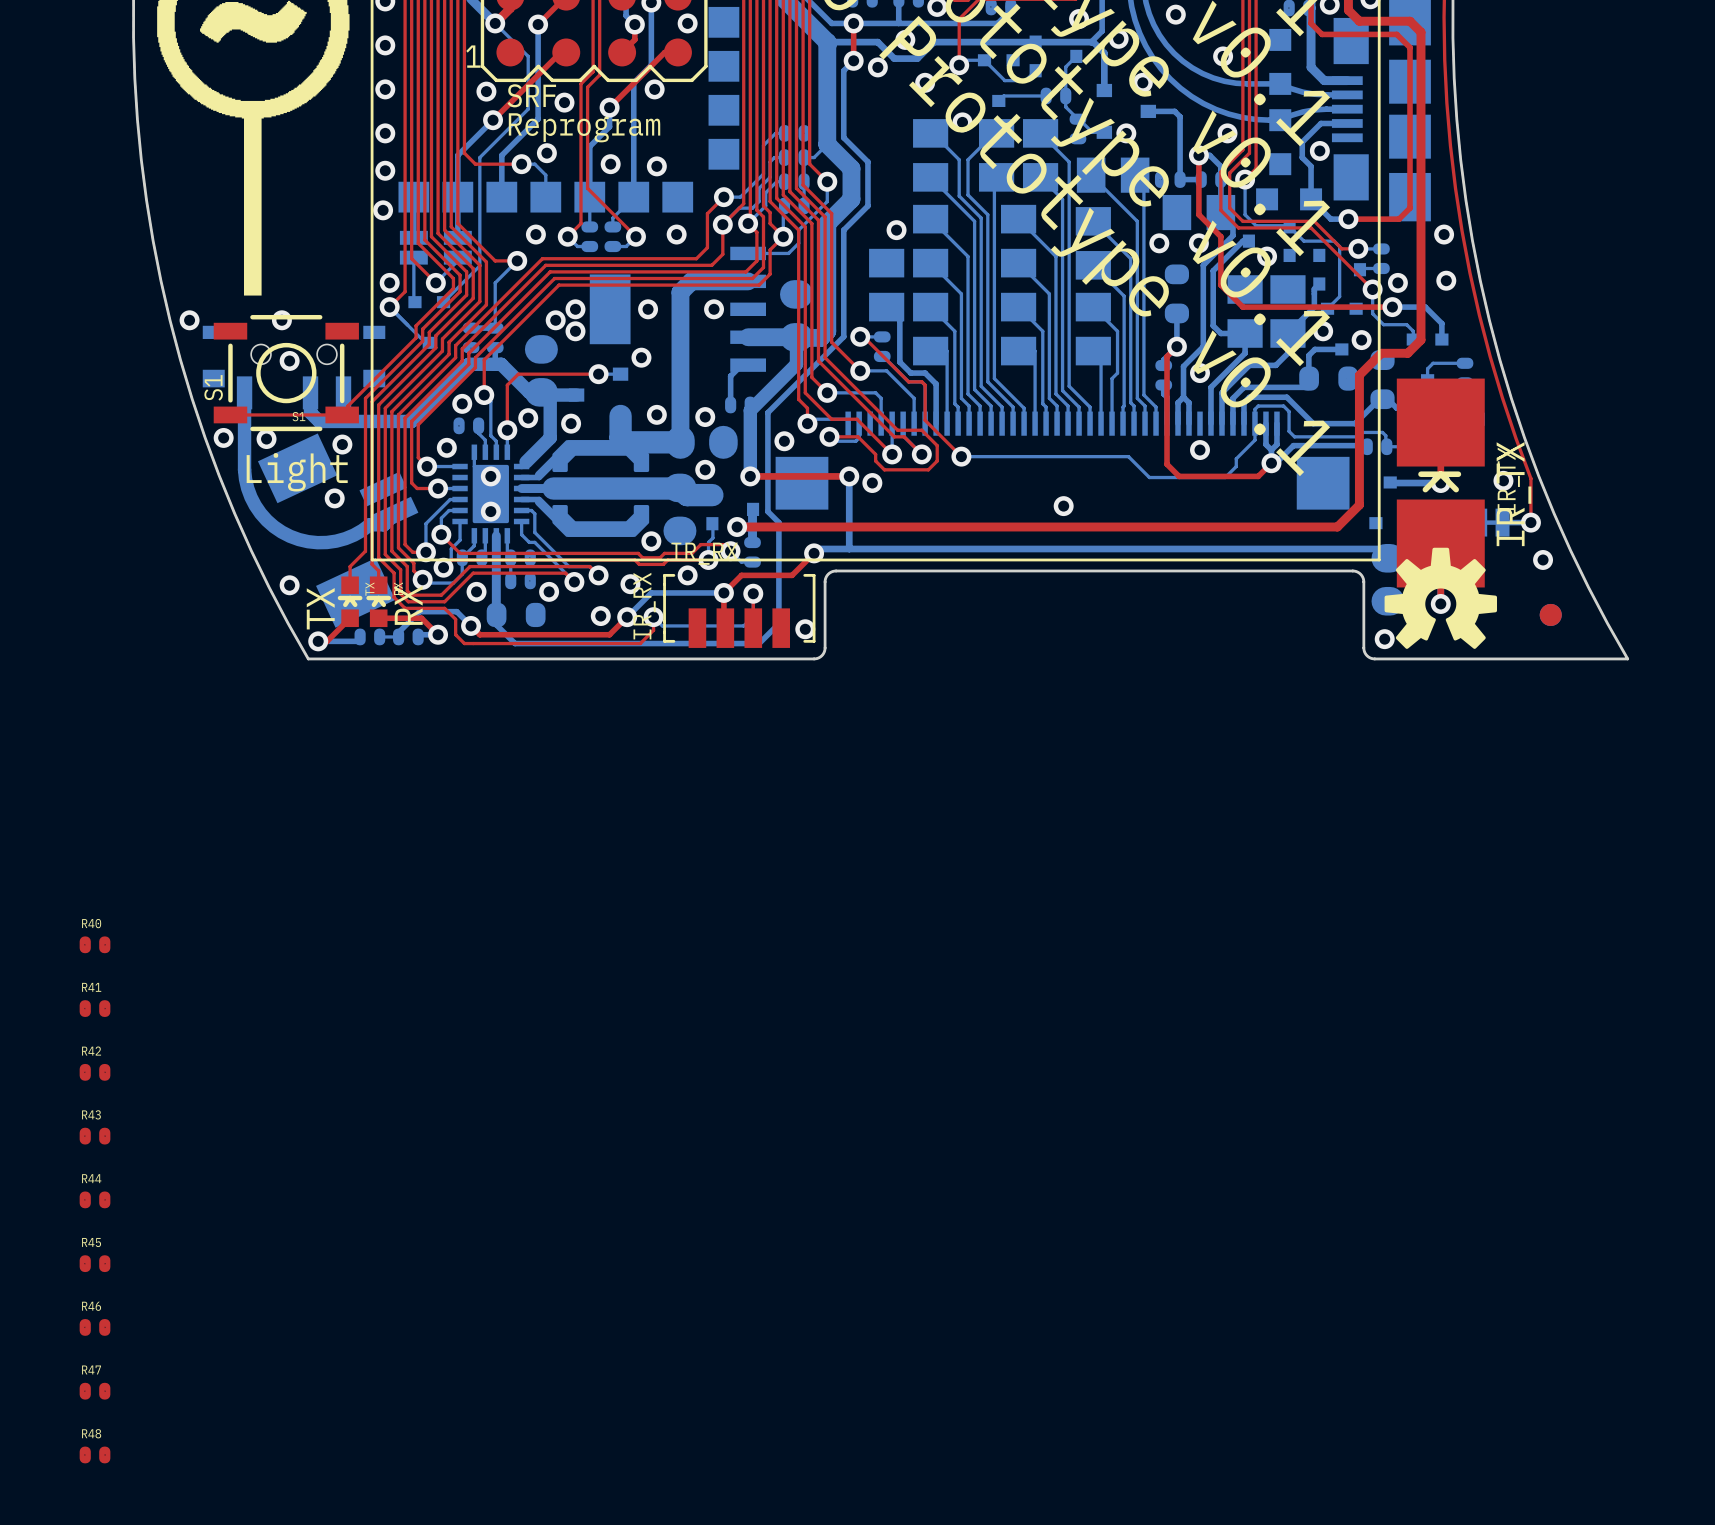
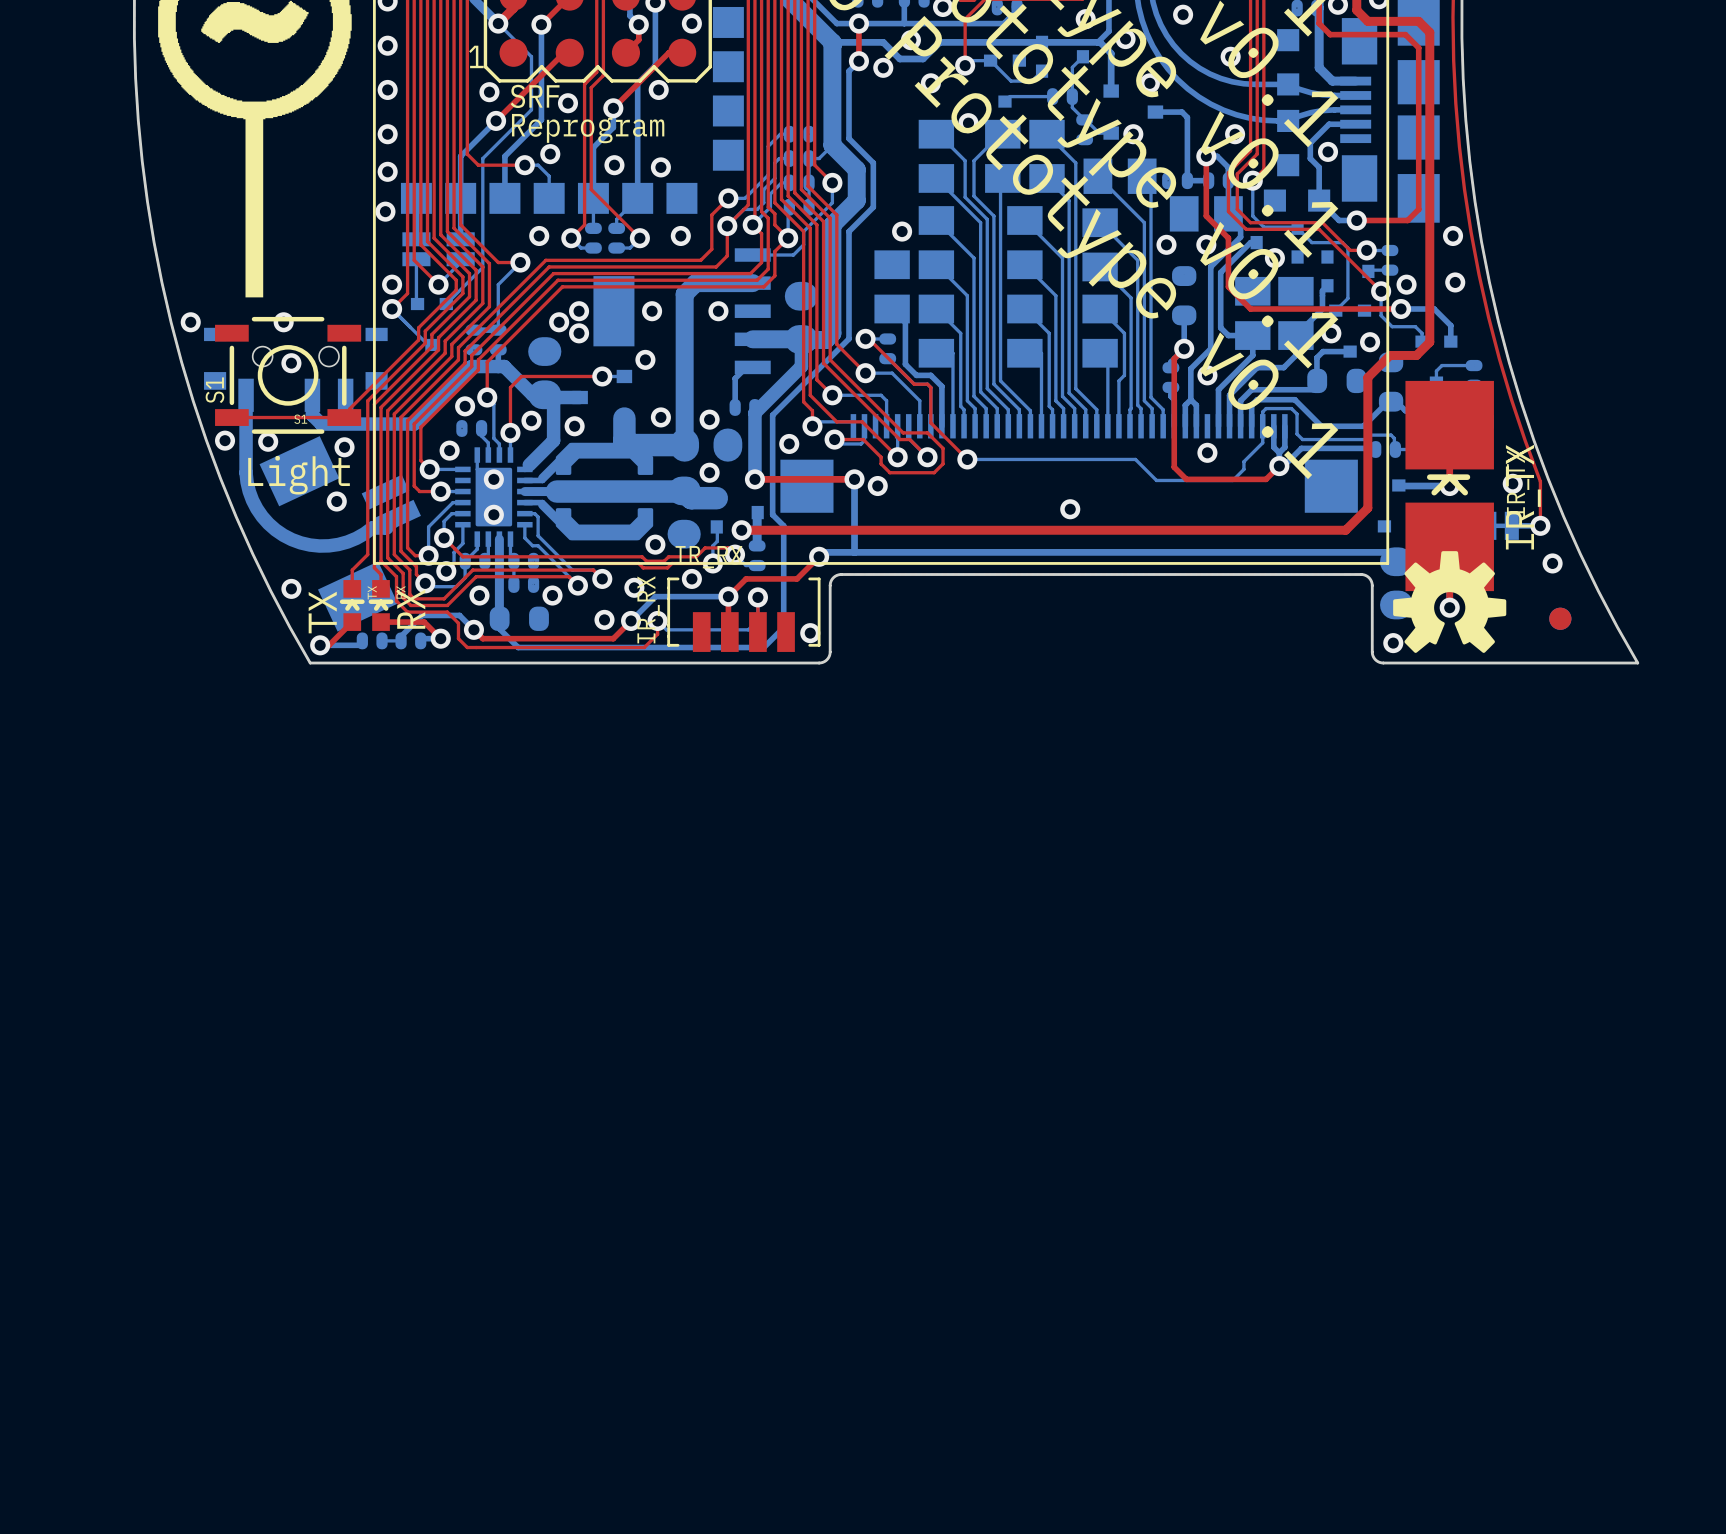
R40: (95, 944) -> none
R41: (95, 1008) -> none
R42: (95, 1072) -> none
R43: (95, 1136) -> none
R44: (95, 1199) -> none
R45: (95, 1263) -> none
R46: (95, 1327) -> none
R47: (95, 1391) -> none
R48: (95, 1454) -> none

